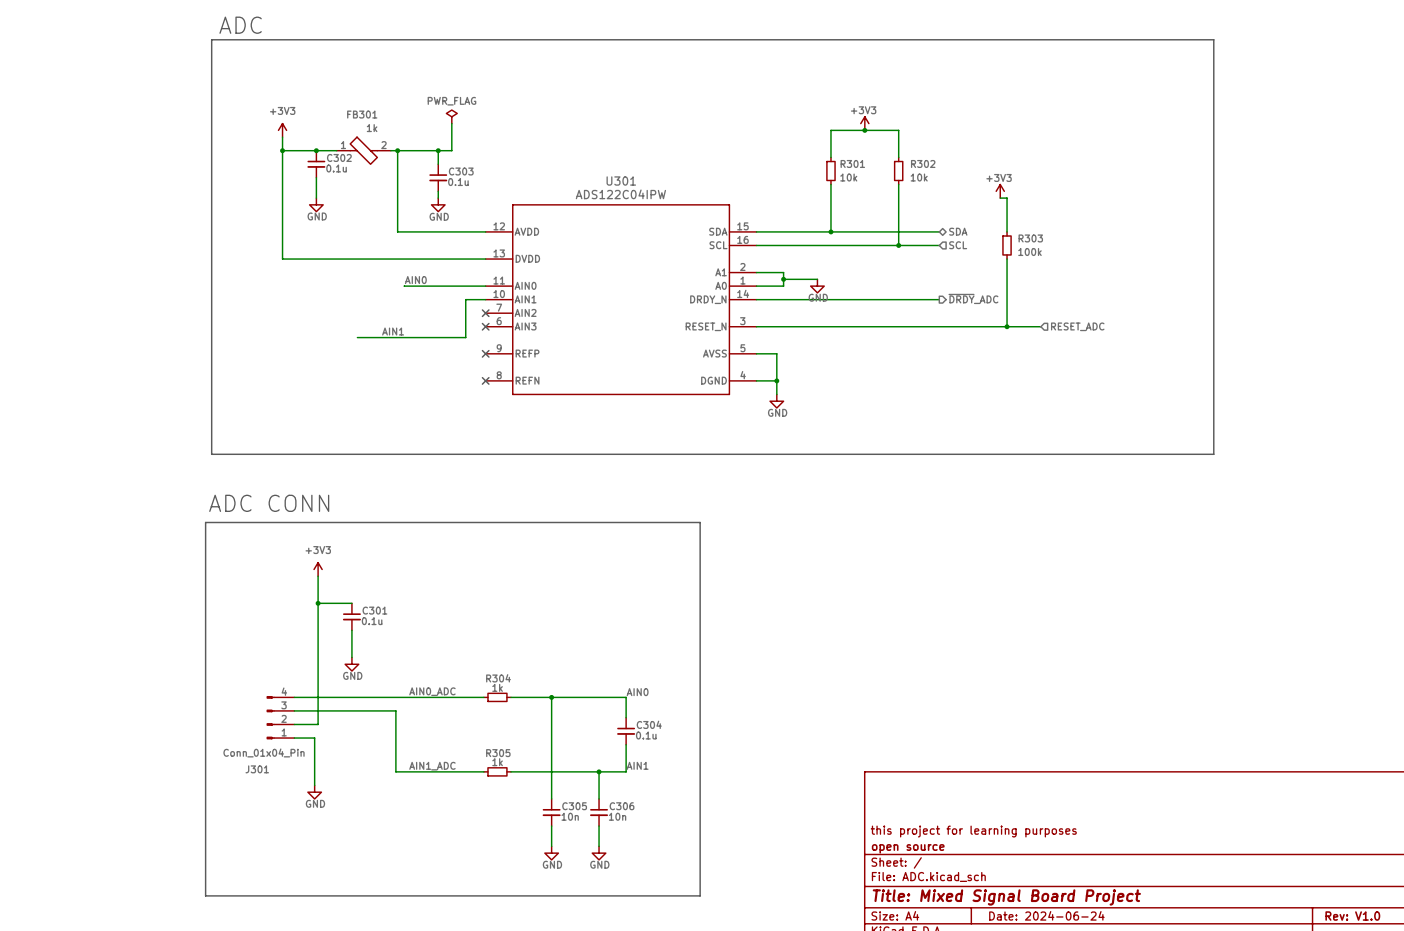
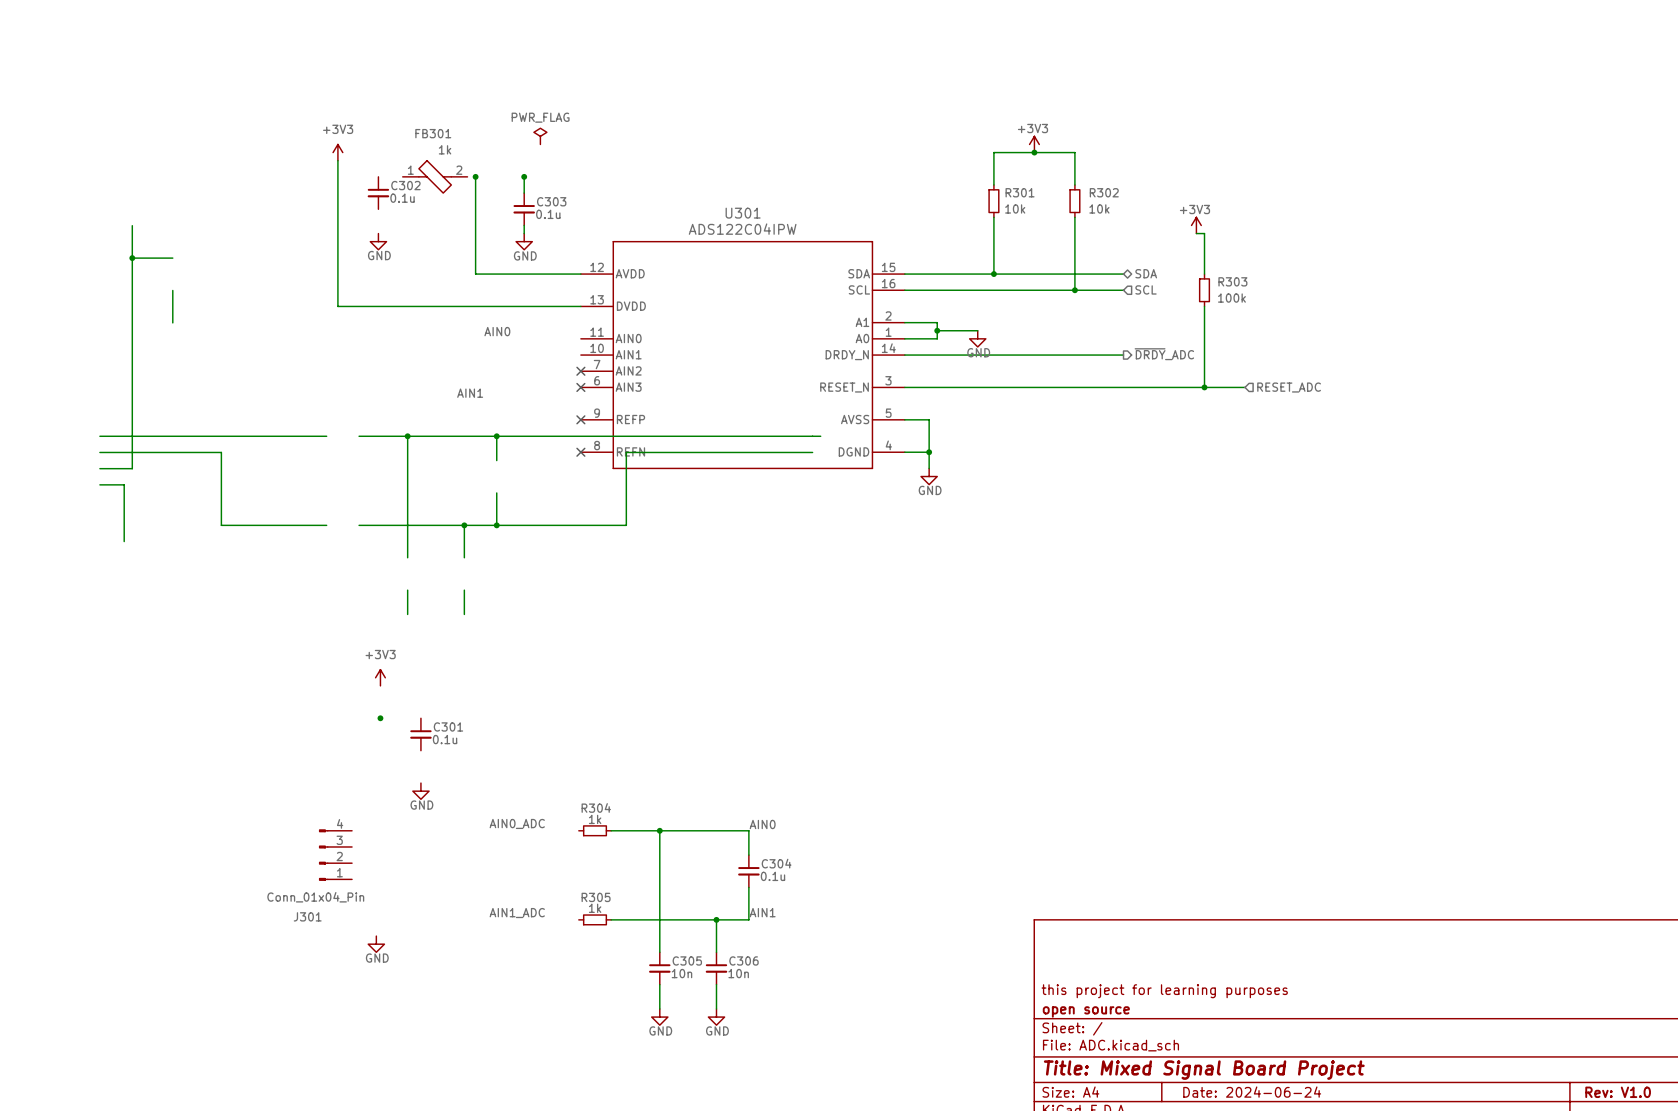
text: ADC (240, 25) -> none
line: (211, 39) (1213, 39) (1213, 454) (211, 454) (211, 39) -> none
wire: (451, 123) (451, 150) (390, 150) -> none
wire: (282, 150) (336, 150) -> none
junction: (282, 150) -> none
junction: (316, 150) -> none
wire: (316, 177) (316, 198) -> none
wire: none -> (132, 225) (132, 468) (99, 468)
wire: none -> (132, 258) (172, 258)
junction: none -> (132, 258)
wire: none -> (172, 290) (172, 322)
wire: (404, 286) (485, 286) -> none
wire: (485, 299) (465, 299) (465, 337) (357, 337) -> none
wire: none -> (99, 436) (326, 436)
wire: none -> (359, 436) (820, 436)
wire: none -> (407, 436) (407, 557)
junction: none -> (407, 436)
wire: none -> (496, 436) (496, 460)
junction: none -> (496, 436)
wire: none -> (99, 452) (221, 452) (221, 525) (326, 525)
wire: none -> (812, 452) (626, 452) (626, 525) (359, 525)
wire: none -> (99, 484) (124, 484) (124, 541)
wire: none -> (496, 492) (496, 525)
wire: none -> (464, 525) (464, 557)
junction: none -> (464, 525)
junction: none -> (496, 525)
wire: none -> (407, 590) (407, 614)
wire: none -> (464, 590) (464, 614)
text: ADC CONN (269, 503) -> none
line: (205, 522) (700, 522) (700, 895) (205, 895) (205, 522) -> none
wire: (318, 576) (318, 724) (294, 724) -> none
wire: (318, 603) (351, 603) -> none
wire: (351, 630) (351, 657) -> none
wire: (294, 697) (483, 697) -> none
wire: (294, 710) (395, 710) (395, 771) (483, 771) -> none
wire: (294, 738) (314, 738) (314, 785) -> none

